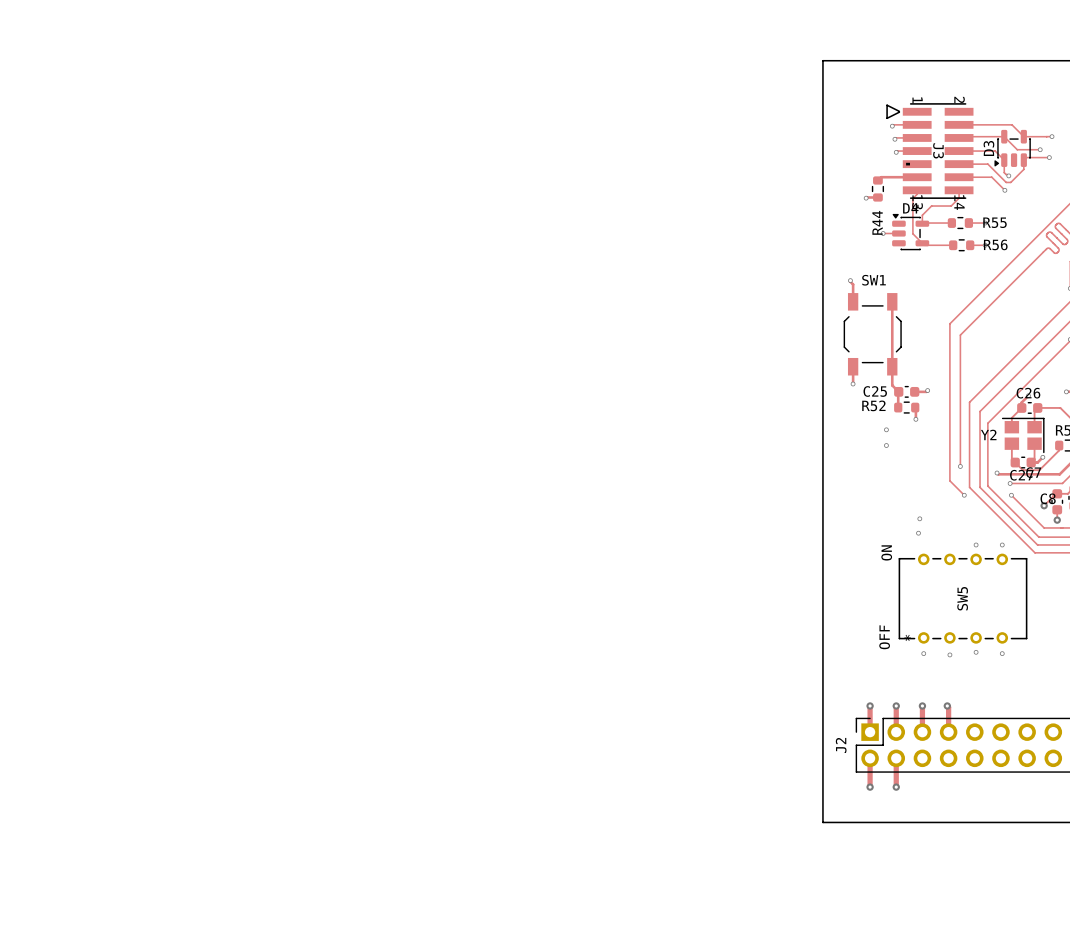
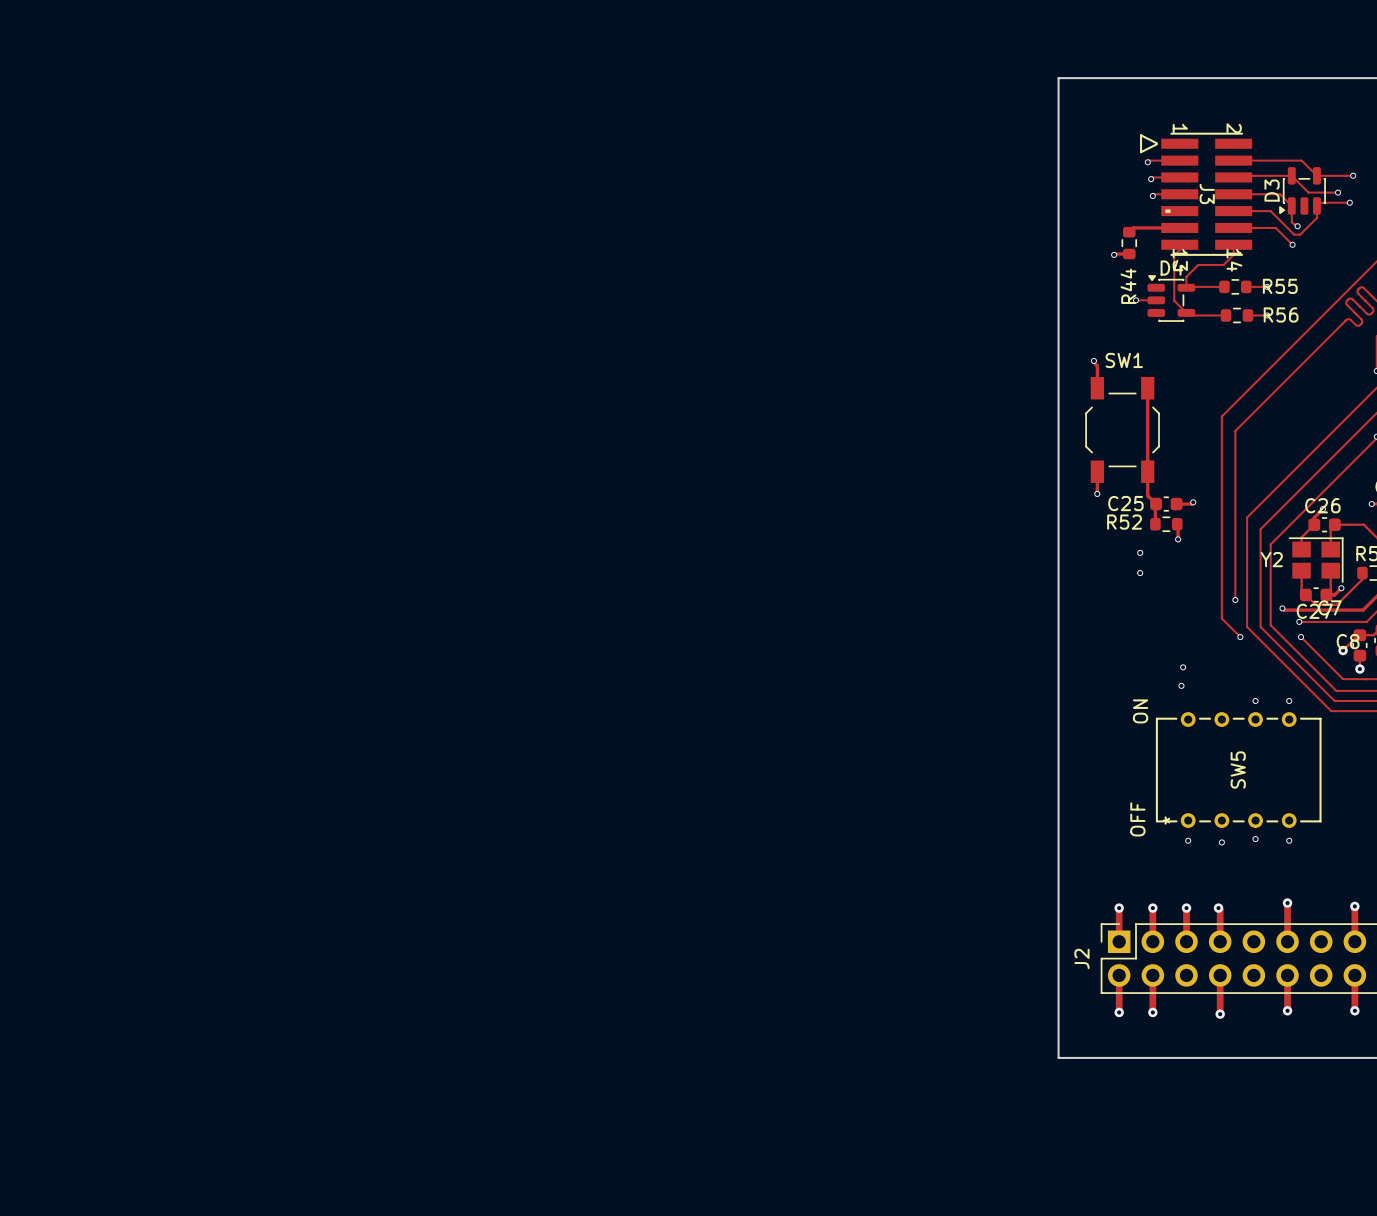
track: none -> (1287, 903) (1287, 941)
via: none -> (1287, 903)
track: none -> (1354, 906) (1354, 941)
via: none -> (1354, 906)
track: none -> (1220, 975) (1220, 1014)
track: none -> (1287, 975) (1287, 1010)
track: none -> (1354, 975) (1354, 1010)
via: none -> (1287, 1010)
via: none -> (1354, 1010)
via: none -> (1220, 1014)

